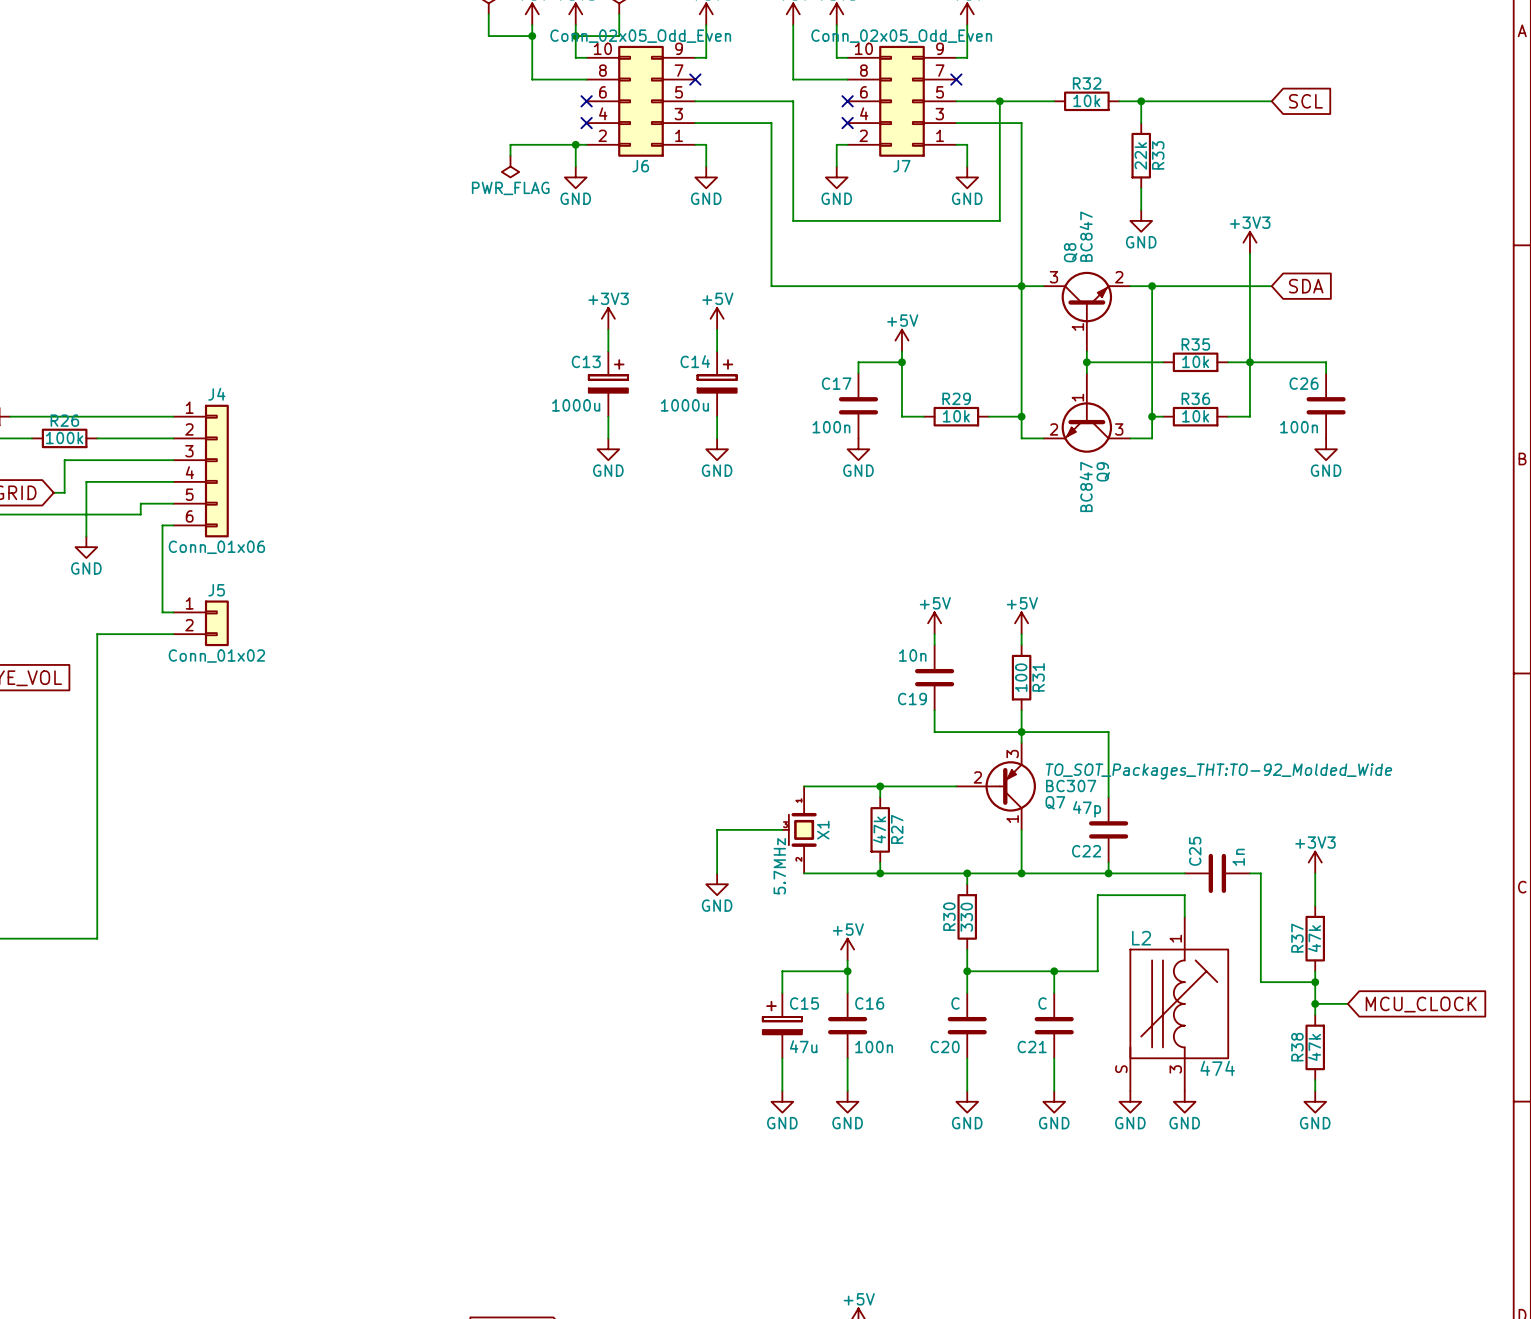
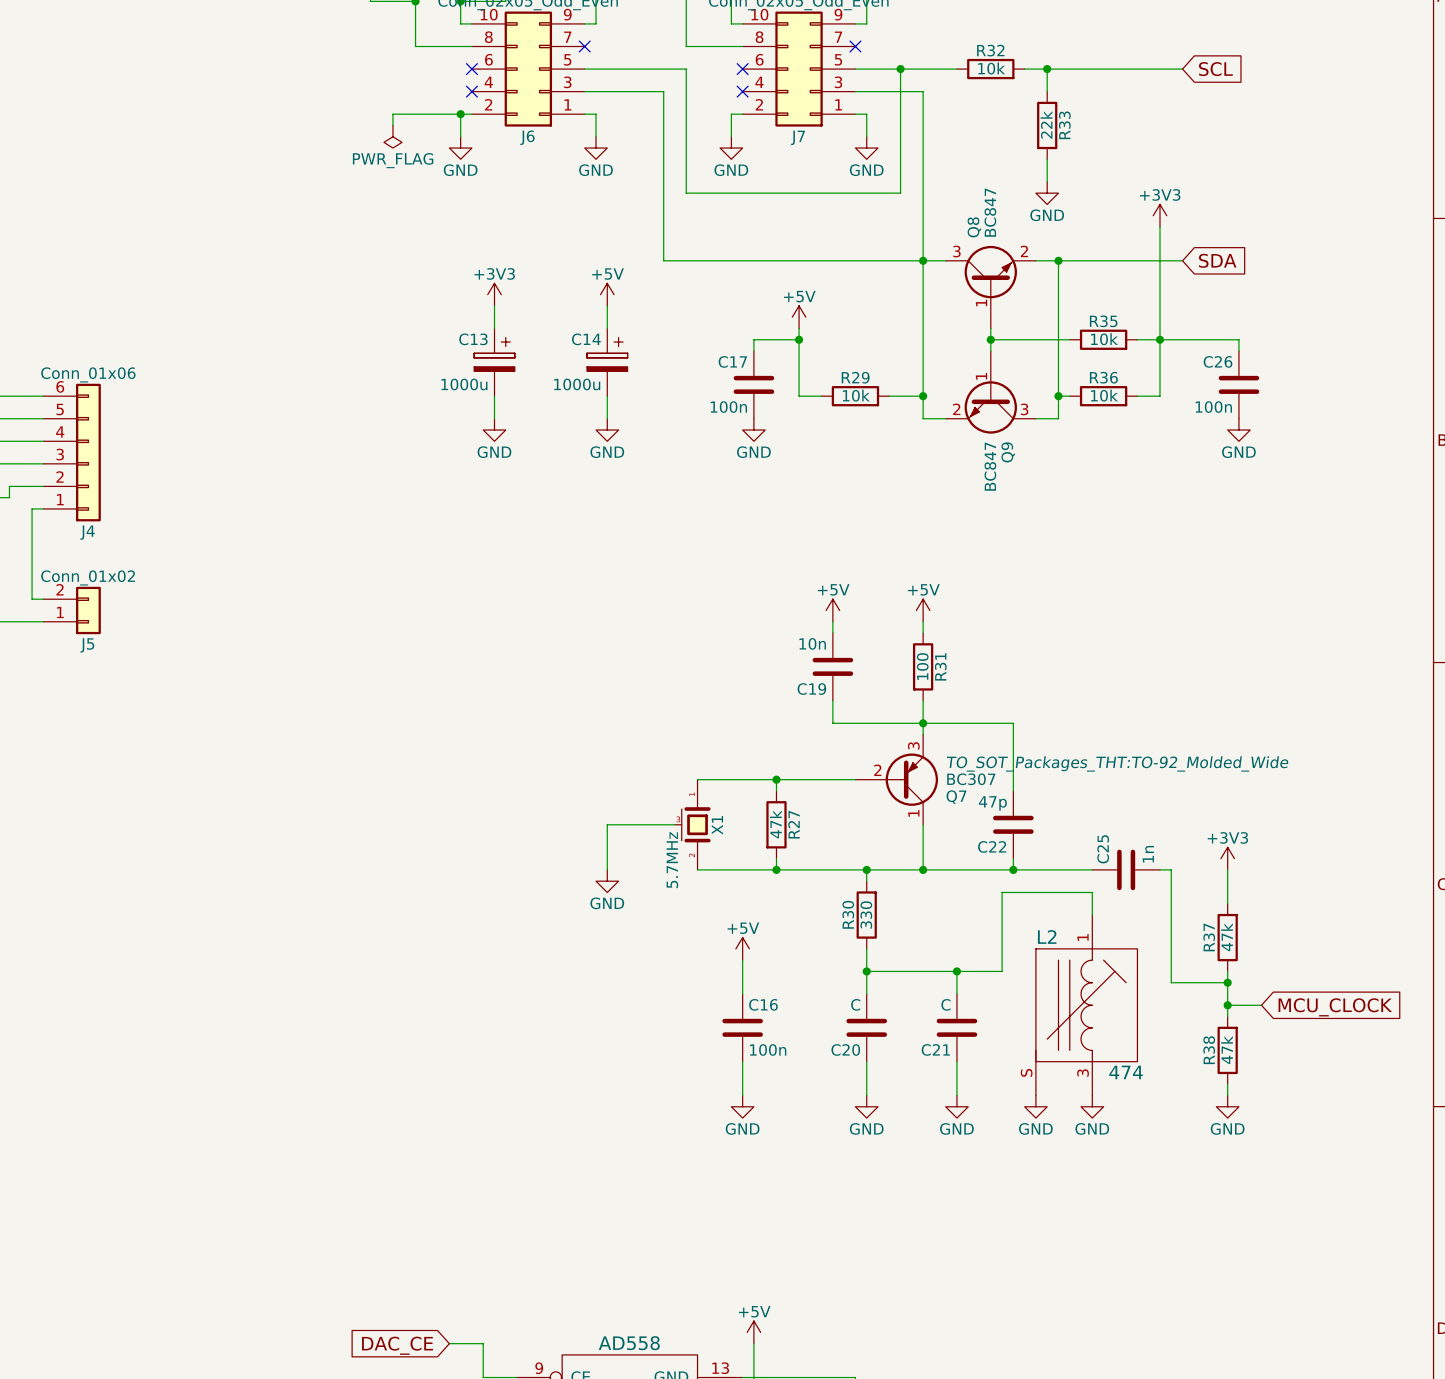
J4 flip: as is (216, 471) -> up-down (88, 452)
J5 flip: as is (216, 623) -> up-down (88, 610)
wire: (847, 971) (782, 971) (782, 993) -> none
junction: (847, 971) -> none
C15: 47u (782, 1025) -> none
wire: (782, 1058) (782, 1090) -> none
power symbol: GND (782, 1101) -> none

